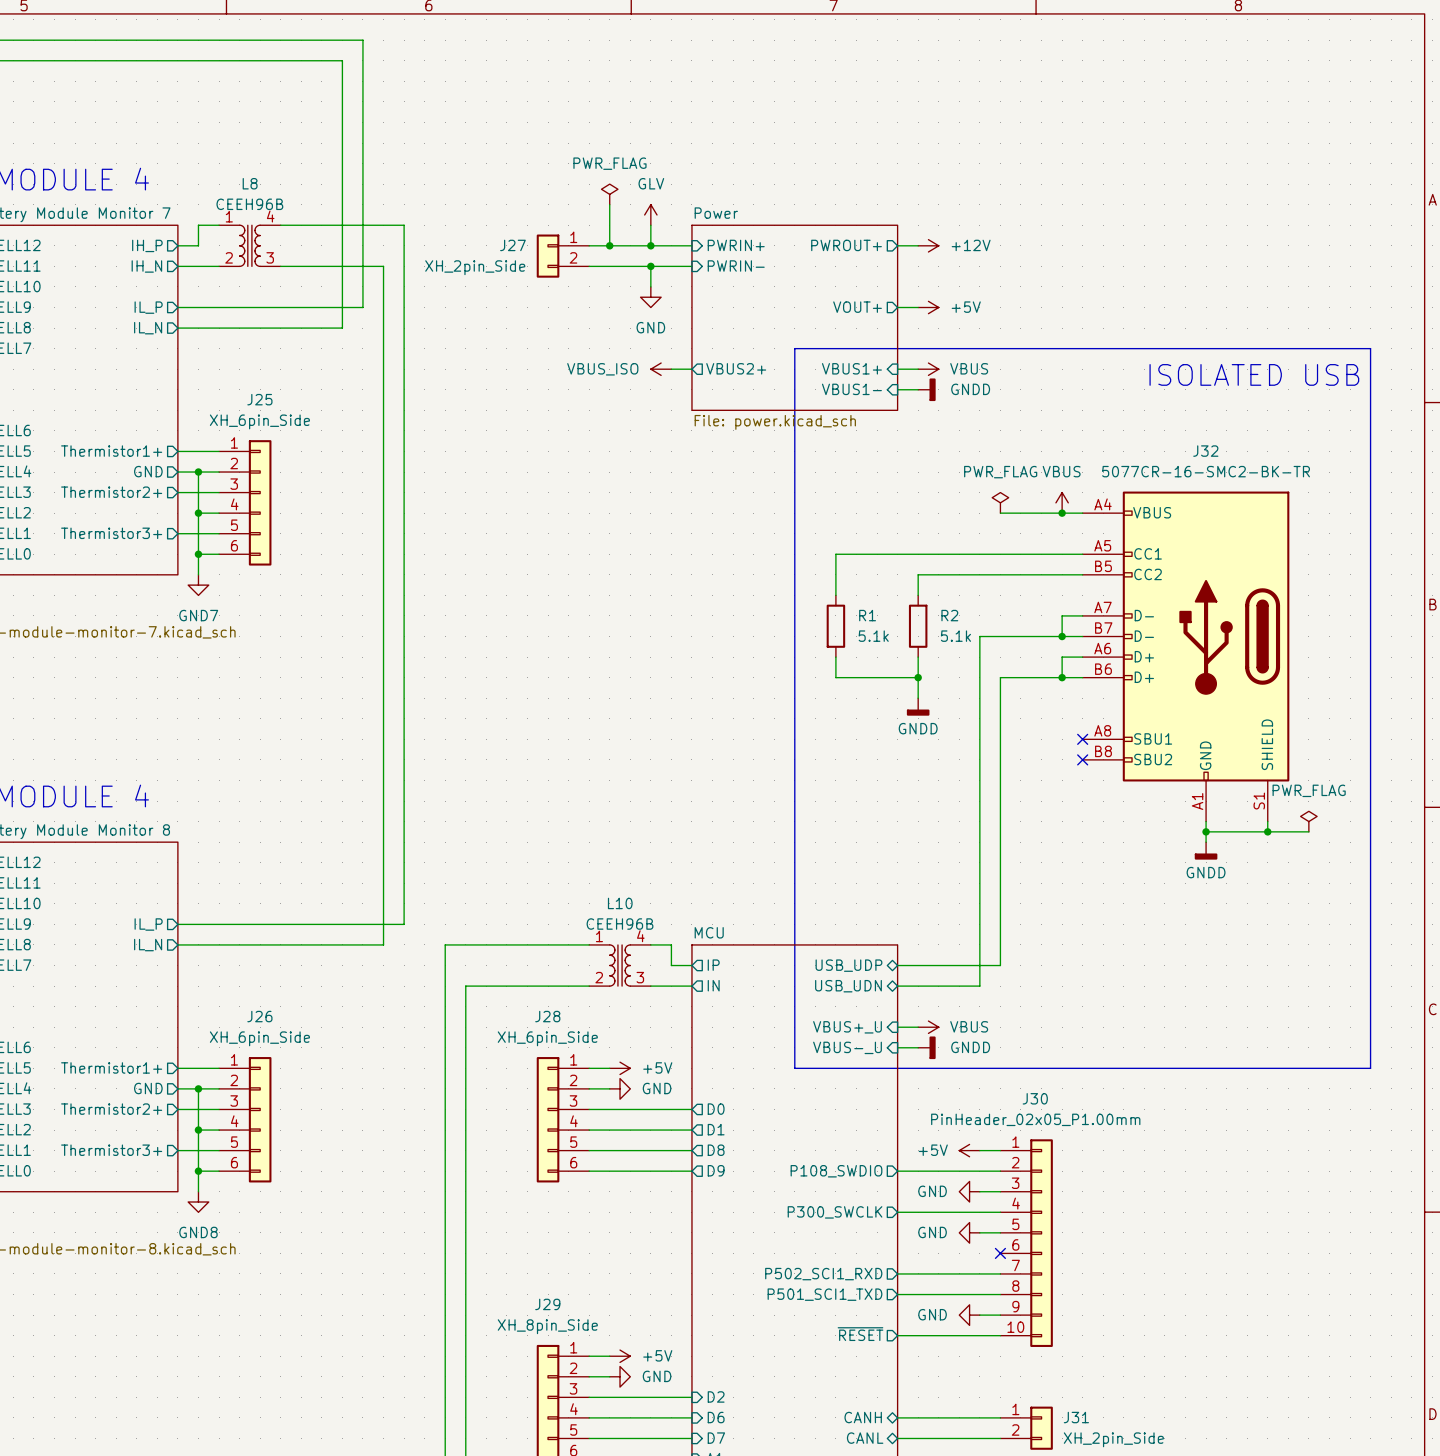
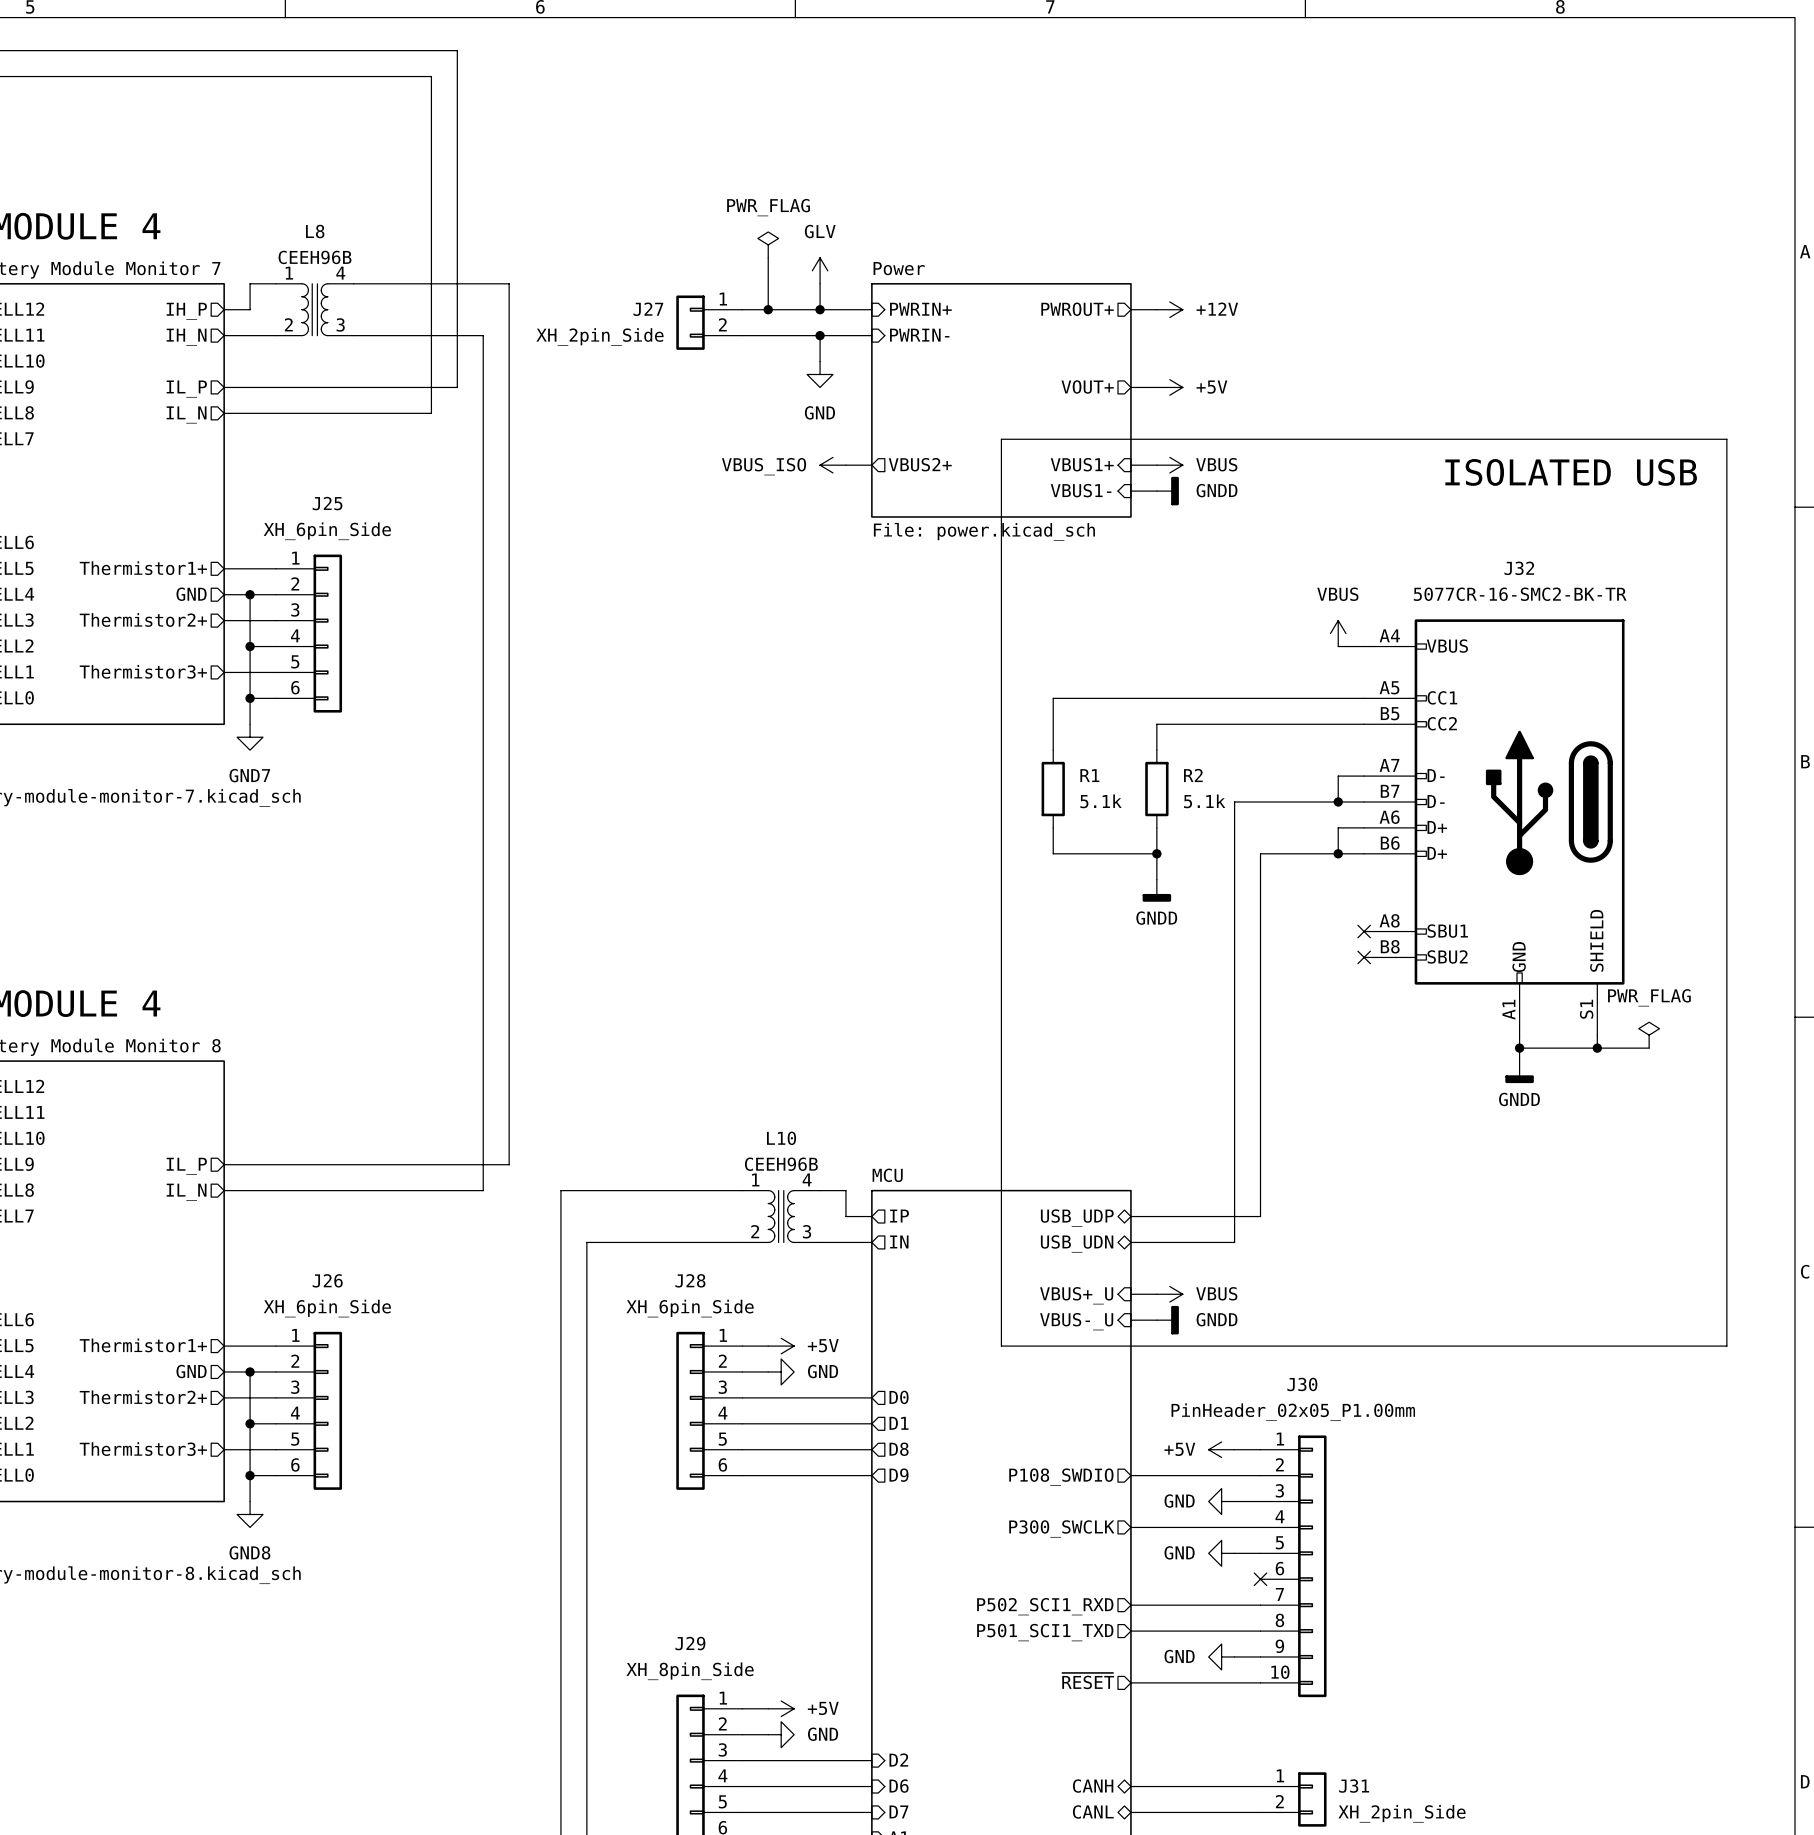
power symbol: PWR_FLAG (1000, 502) -> none
wire: (1000, 513) (1062, 513) -> none
junction: (1062, 513) -> none

